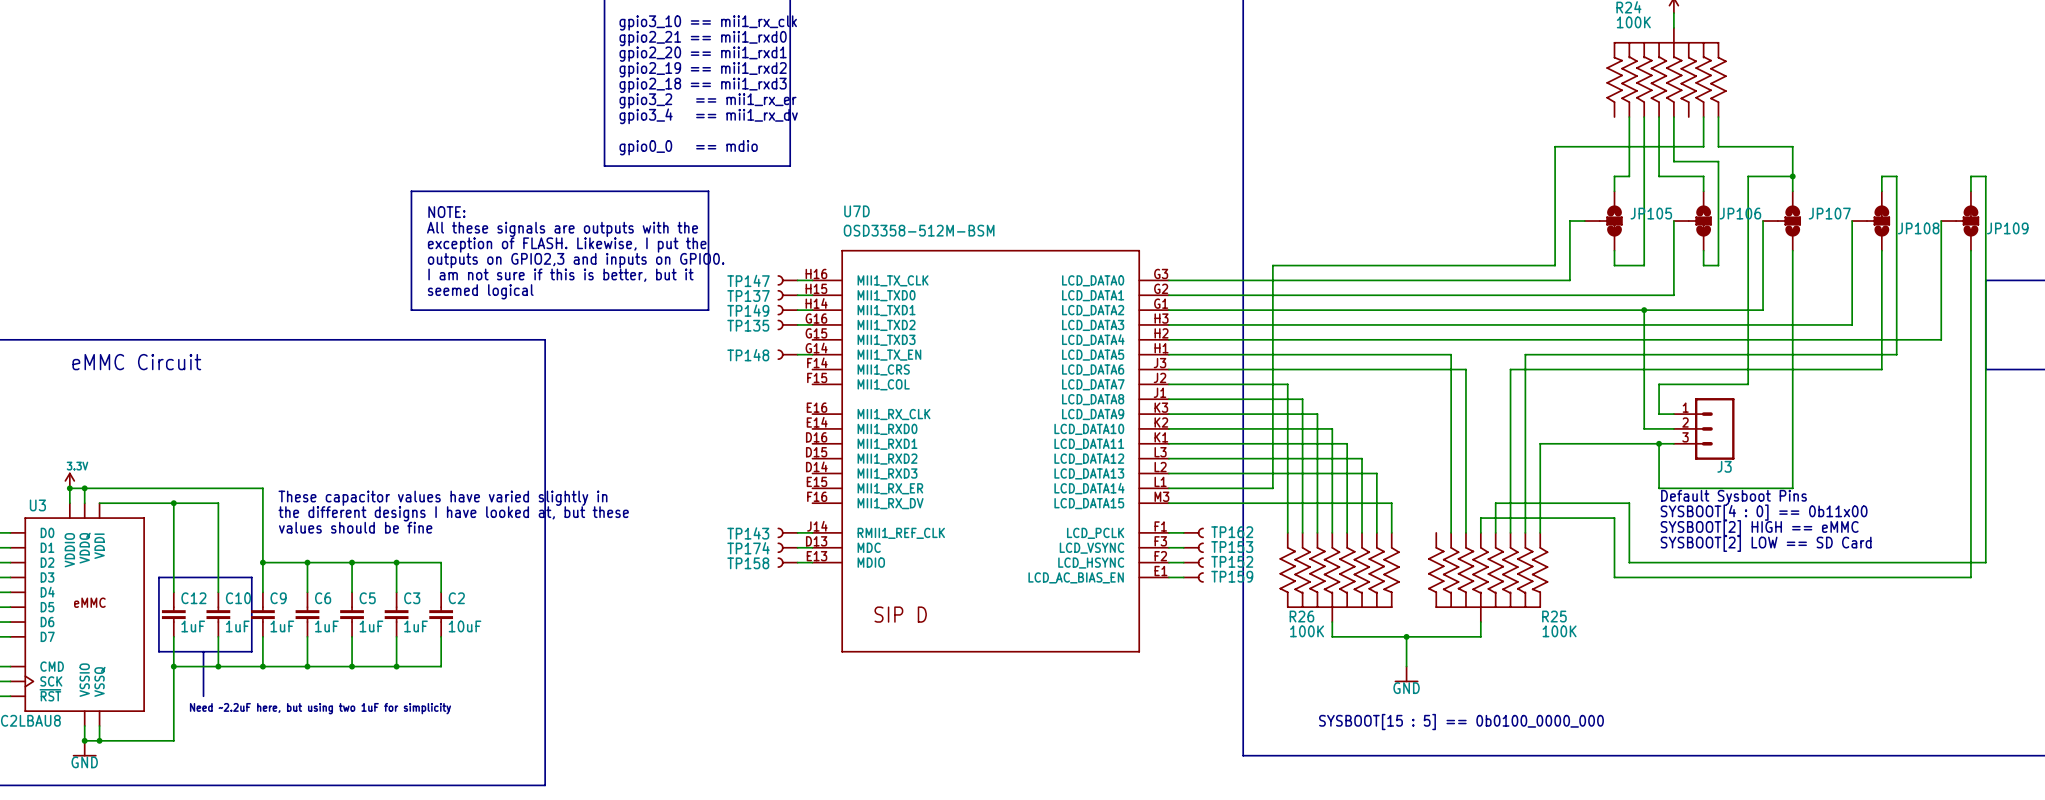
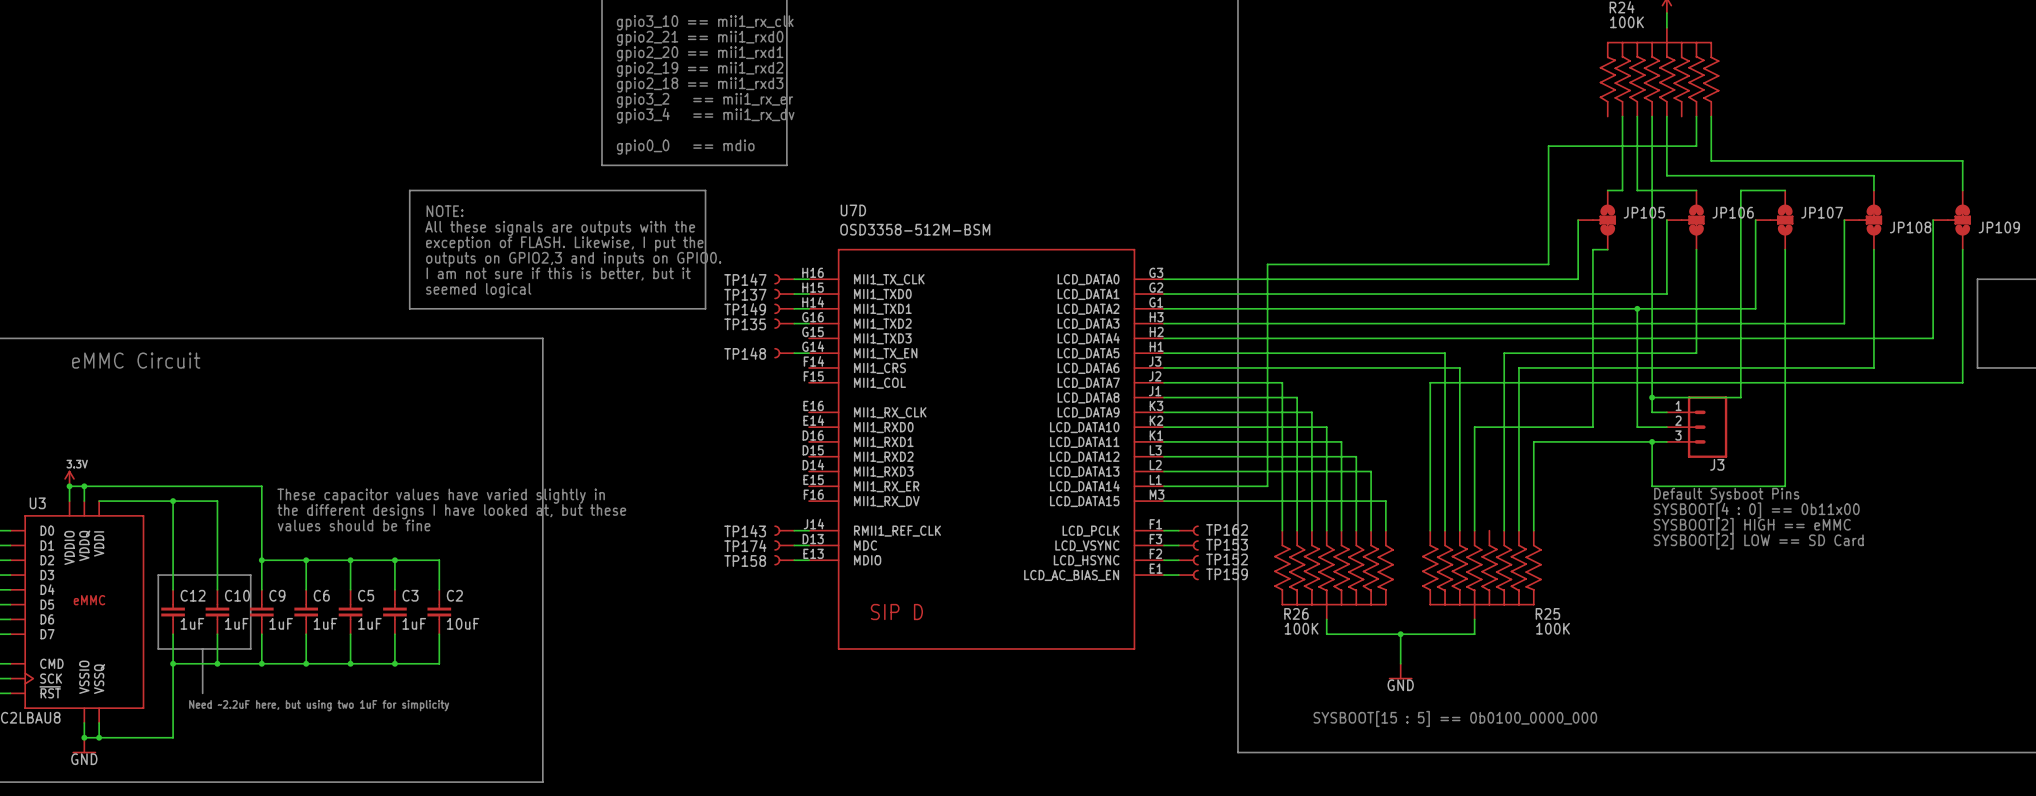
wire: (1718, 146) (1792, 146) (1792, 191) -> (1711, 146) (1711, 160) (1962, 160) (1962, 175)
wire: (1673, 161) (1718, 161) (1718, 265) (1703, 265) -> (1696, 353) (1696, 264)
wire: (1629, 176) (1614, 176) (1614, 191) -> (1622, 175) (1622, 190) (1607, 190)
wire: (1659, 176) (1673, 176) -> (1666, 160) (1666, 175)
wire: none -> (1652, 175) (1652, 382) (1430, 382) (1430, 530)
wire: (1703, 176) (1703, 191) -> (1696, 175) (1740, 175)
wire: (1748, 176) (1748, 191) -> (1785, 190) (1740, 190)
junction: (1792, 176) -> none
wire: (1881, 176) (1896, 176) (1896, 354) (1703, 354) -> (1873, 175) (1785, 175)
wire: (1970, 176) (1985, 176) (1985, 562) (1629, 562) (1629, 503) (1495, 503) (1495, 532) -> none
wire: (1644, 191) (1644, 265) (1614, 265) (1614, 250) -> (1637, 190) (1696, 190)
wire: (1584, 221) (1569, 221) (1569, 280) -> (1578, 220) (1578, 279) (1563, 279)
wire: none -> (1607, 249) (1592, 249) (1592, 427) (1474, 427) (1474, 515)
wire: (1525, 354) (1525, 369) (1510, 369) -> (1518, 353) (1504, 353) (1504, 367)
wire: (1970, 384) (1970, 577) (1614, 577) (1614, 518) (1480, 518) -> (1962, 382) (1740, 382) (1740, 397) (1652, 397)
junction: none -> (1652, 397)

